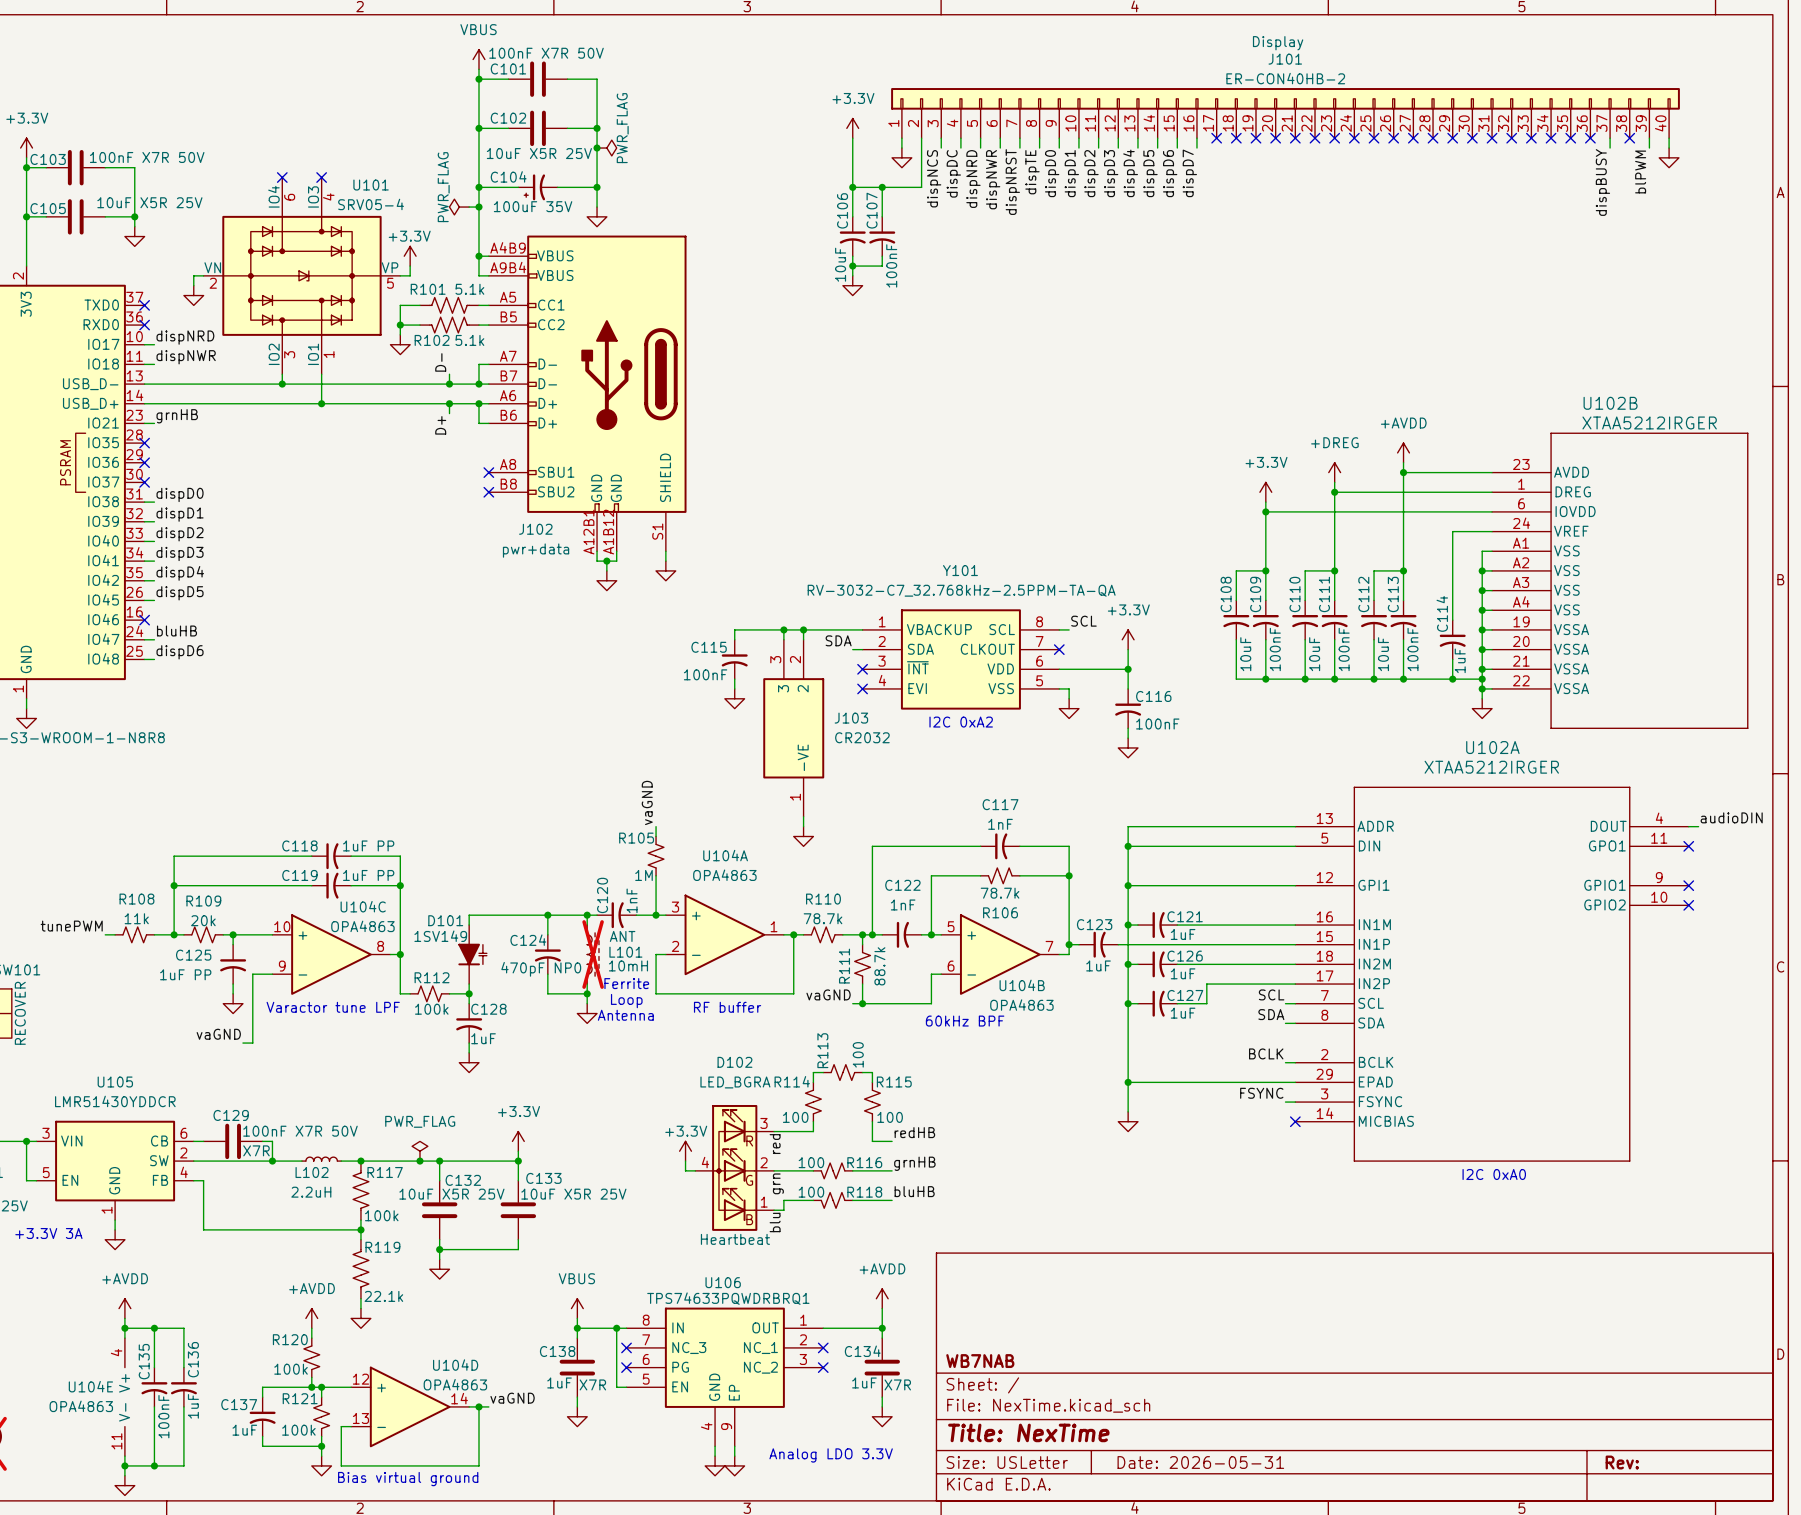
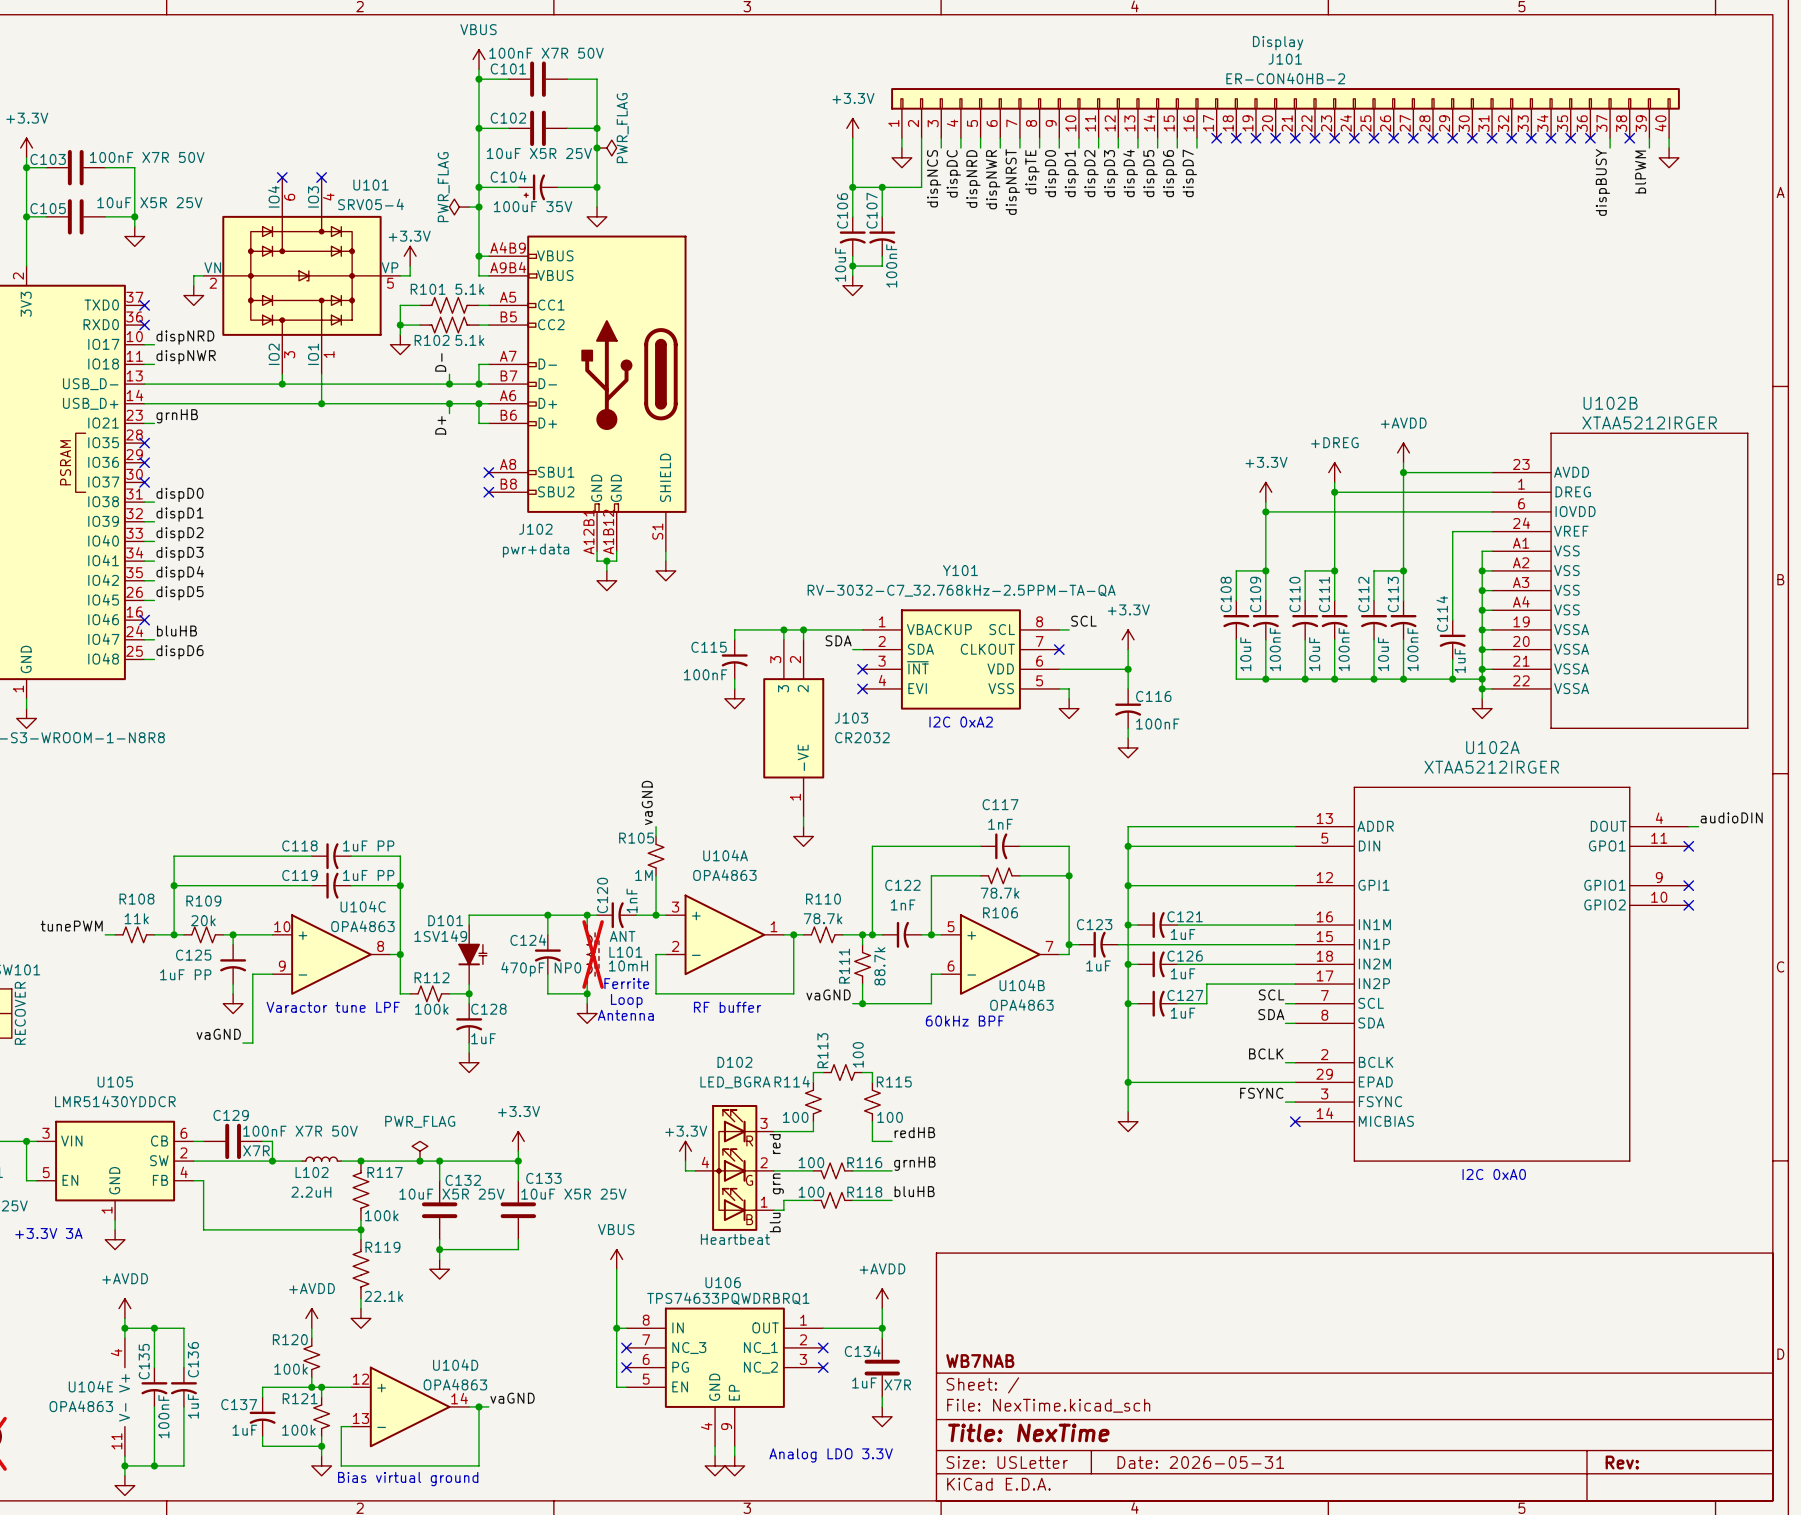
power symbol position: VBUS (577, 1308) -> VBUS (616, 1259)
wire: (577, 1318) (577, 1338) -> none
wire: (577, 1328) (616, 1328) -> (616, 1269) (616, 1328)
junction: (577, 1328) -> none
C138: 1uF (577, 1367) -> none
wire: (577, 1397) (577, 1406) -> none
power symbol: (577, 1416) -> none

